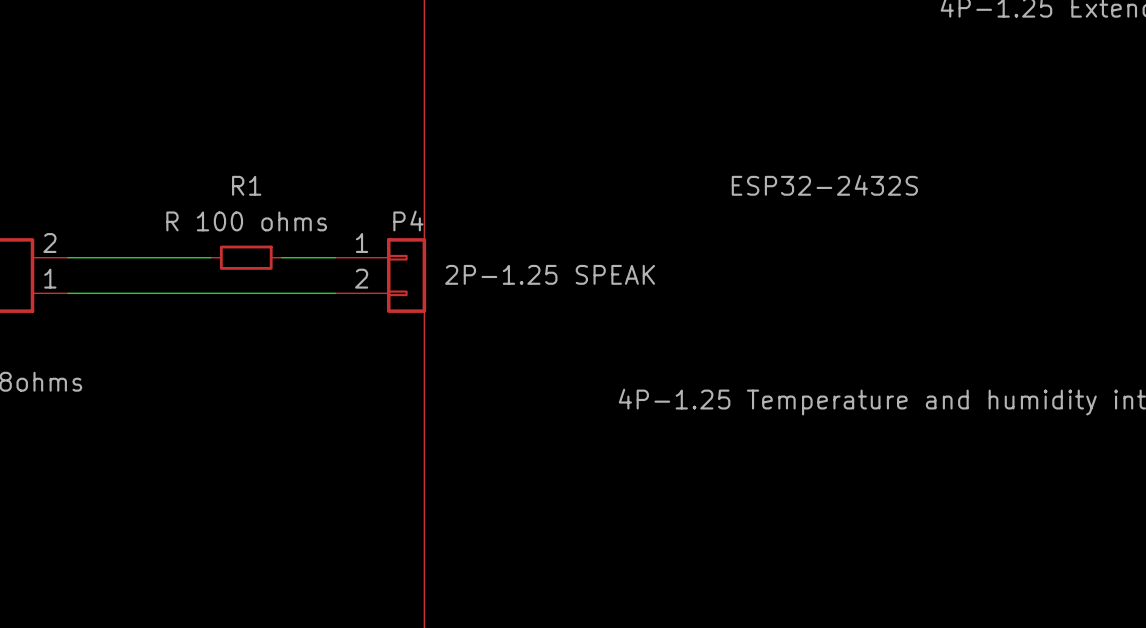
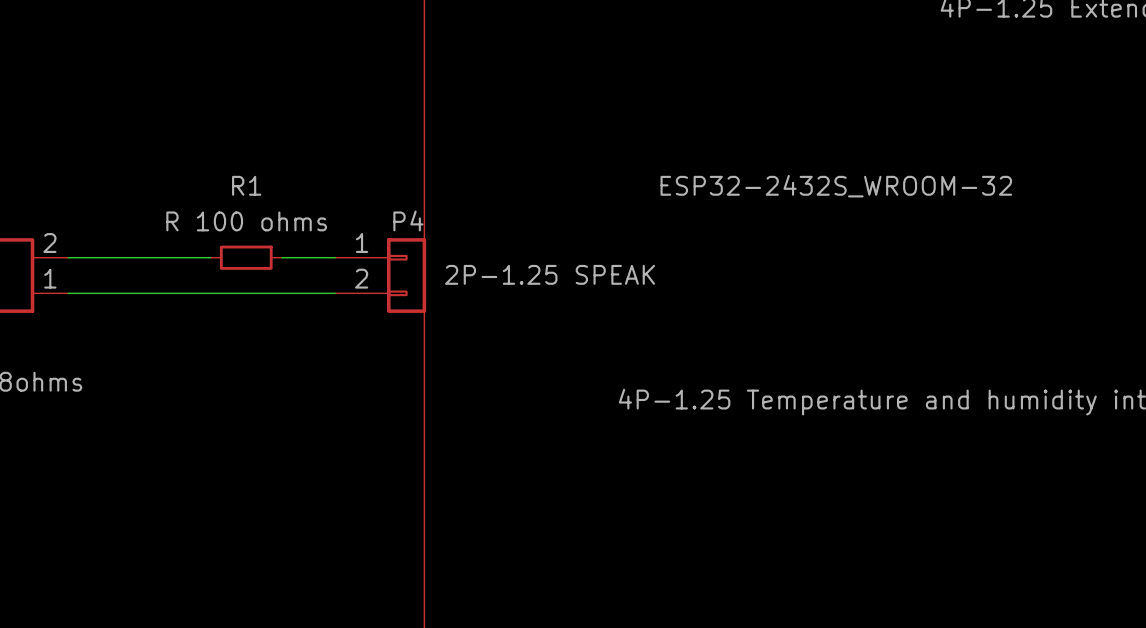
ESP32-2432S name: ESP32-2432S (824, 185) -> ESP32-2432S_WROOM-32 (836, 186)

